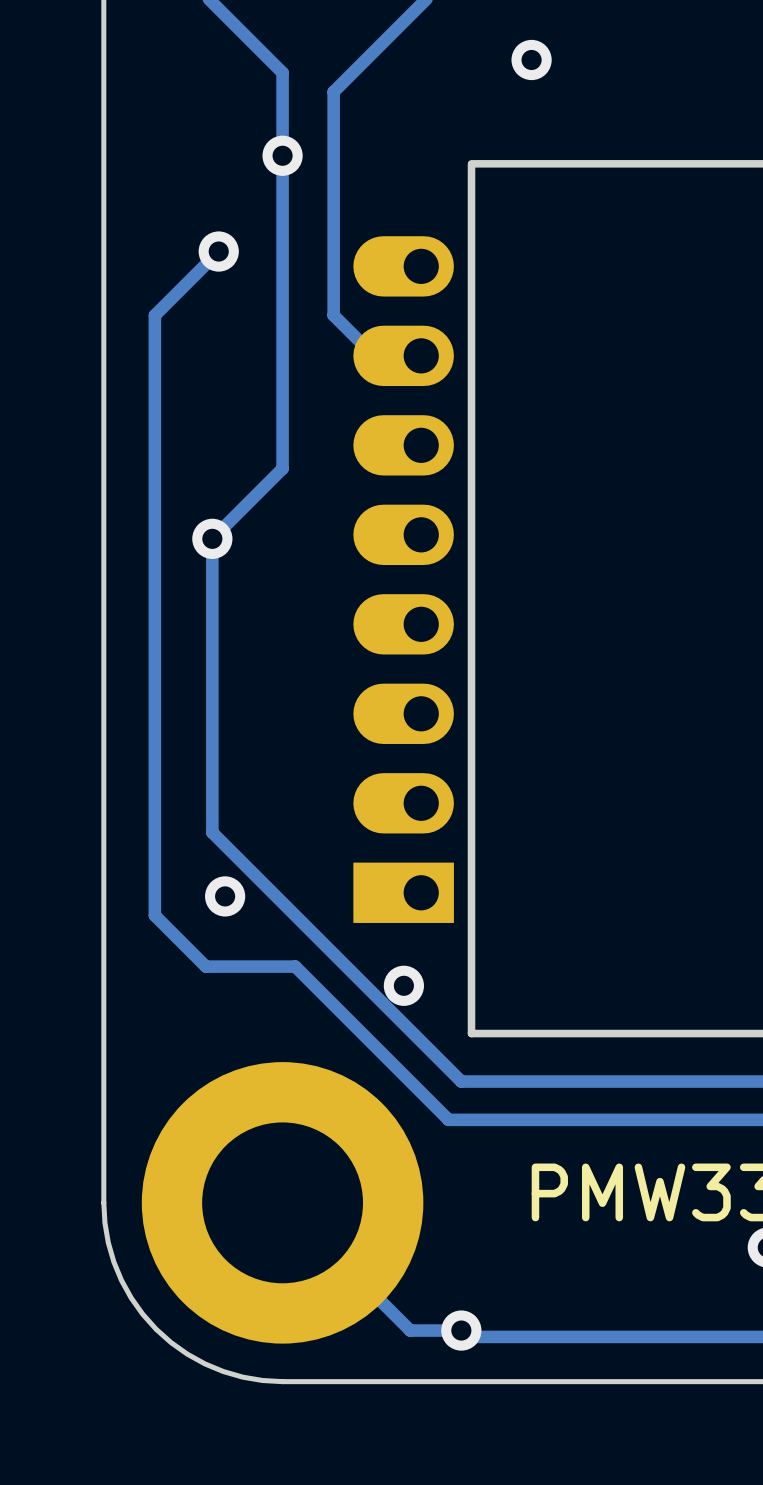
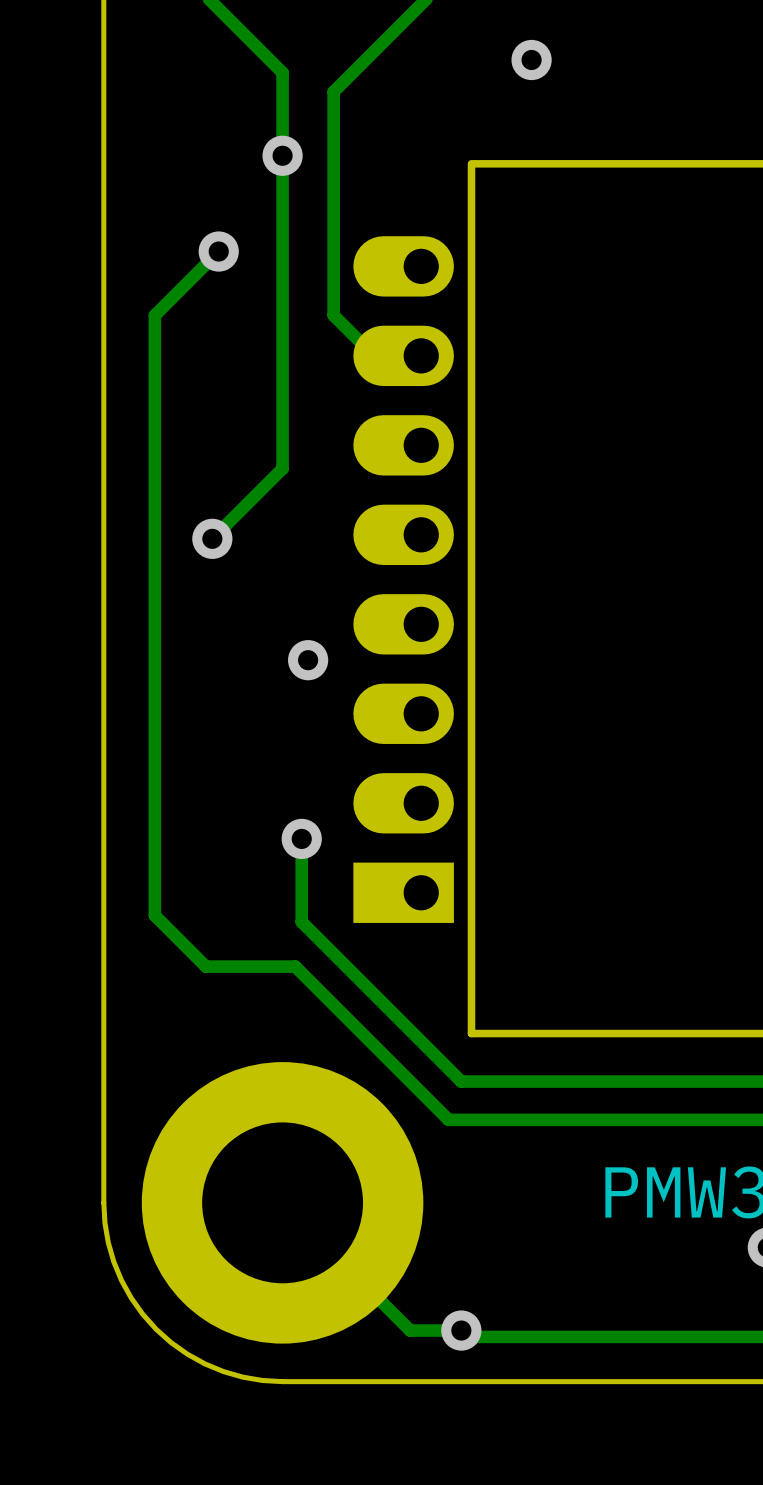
track: (212, 538) (212, 832) (301, 921) -> (301, 838) (301, 921)
via: none -> (308, 660)
via: none -> (301, 838)
via: (225, 896) -> none
via: (403, 985) -> none

